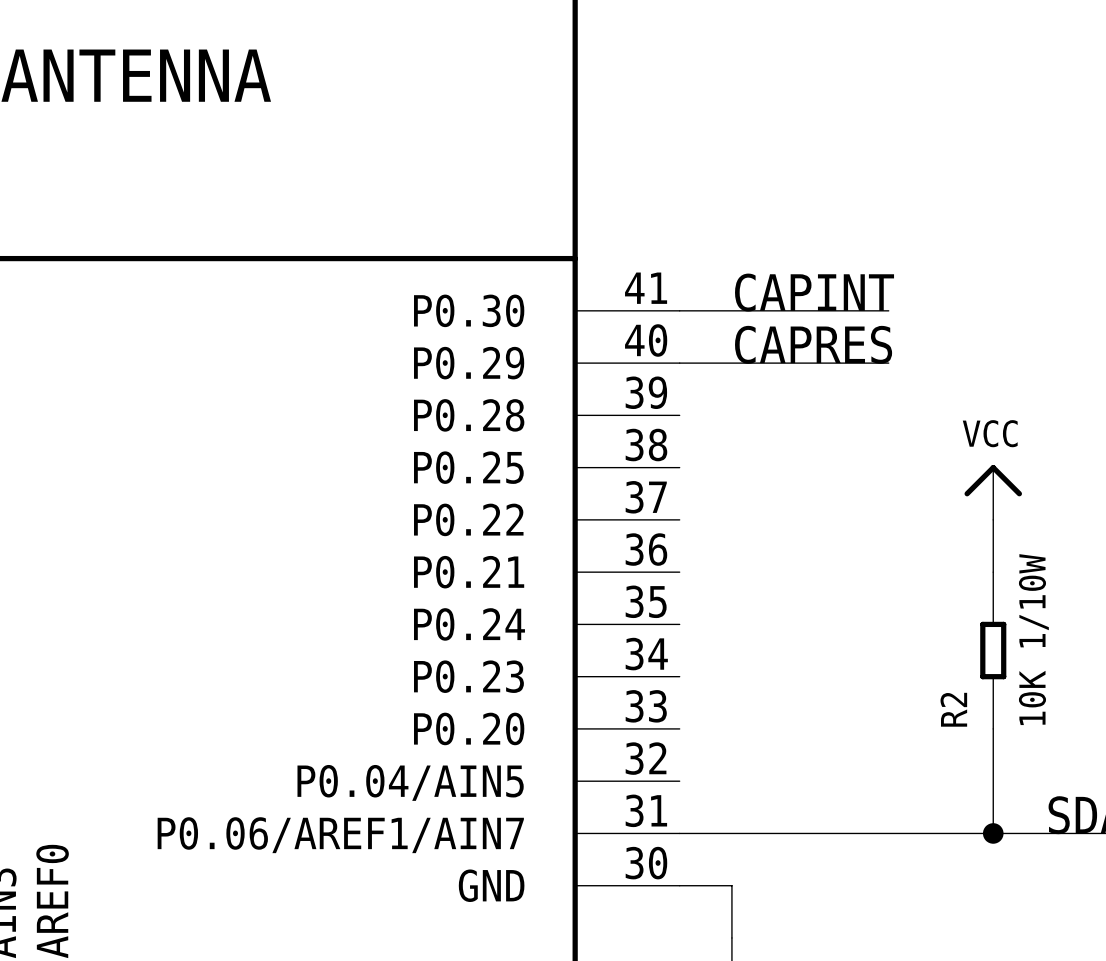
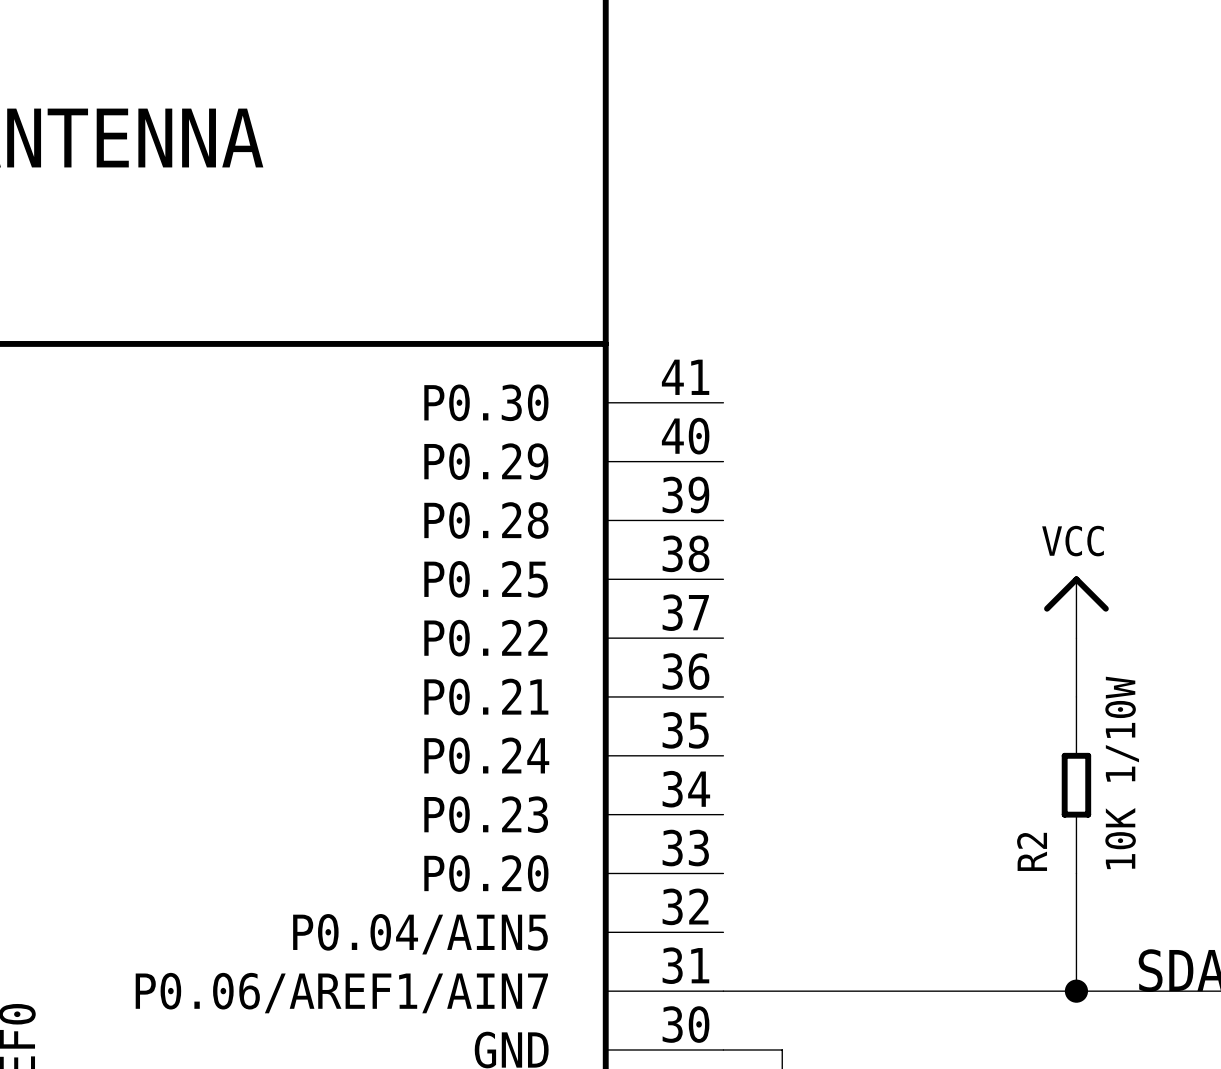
label: CAPINT (814, 292) -> none
wire: (679, 310) (888, 310) -> none
label: CAPRES (813, 344) -> none
wire: (679, 363) (888, 363) -> none

